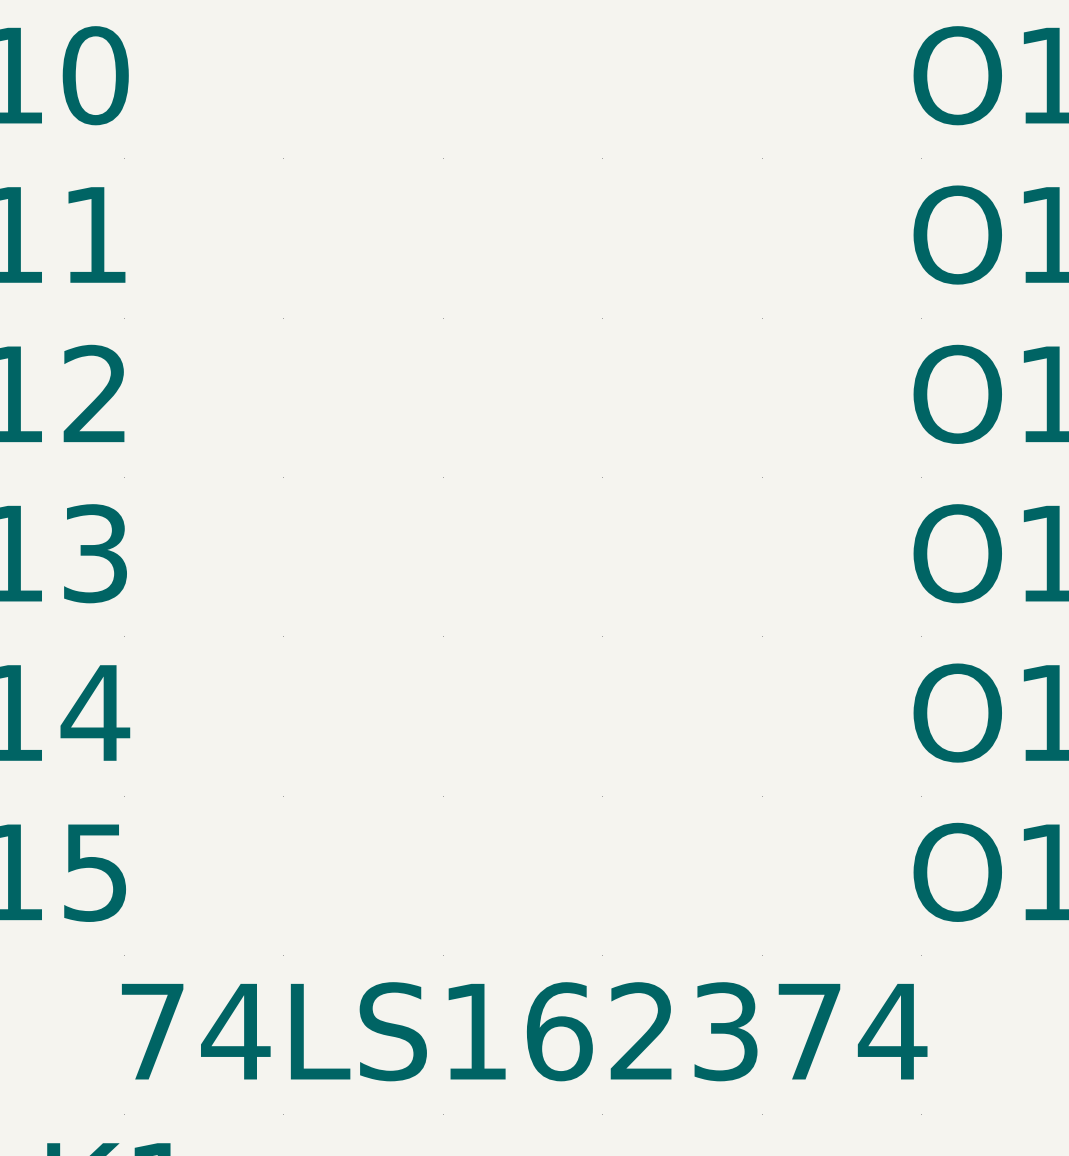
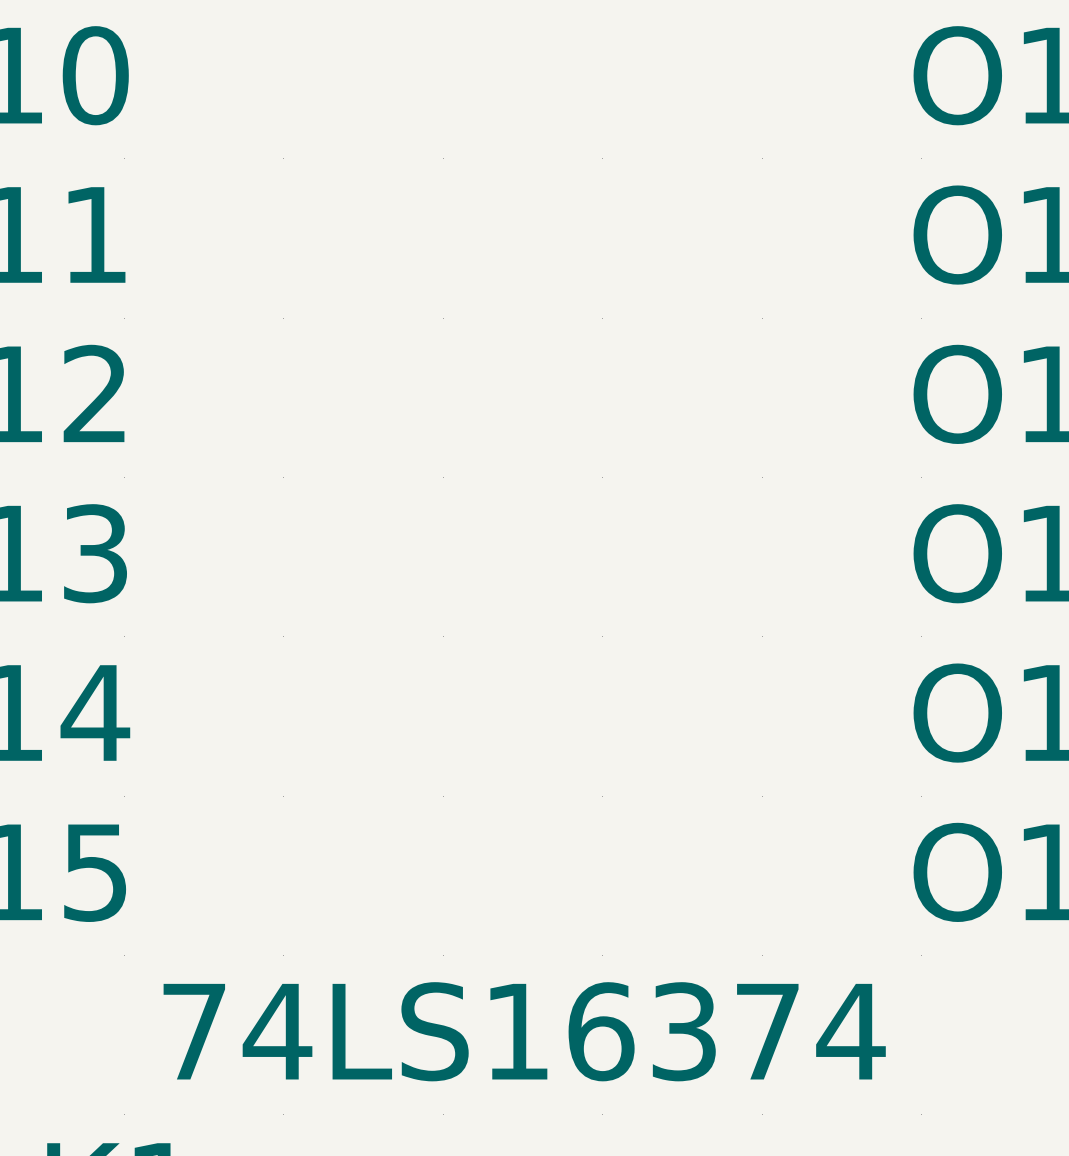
part value: 74LS162374 (524, 1031) -> 74LS16374 (524, 1031)

